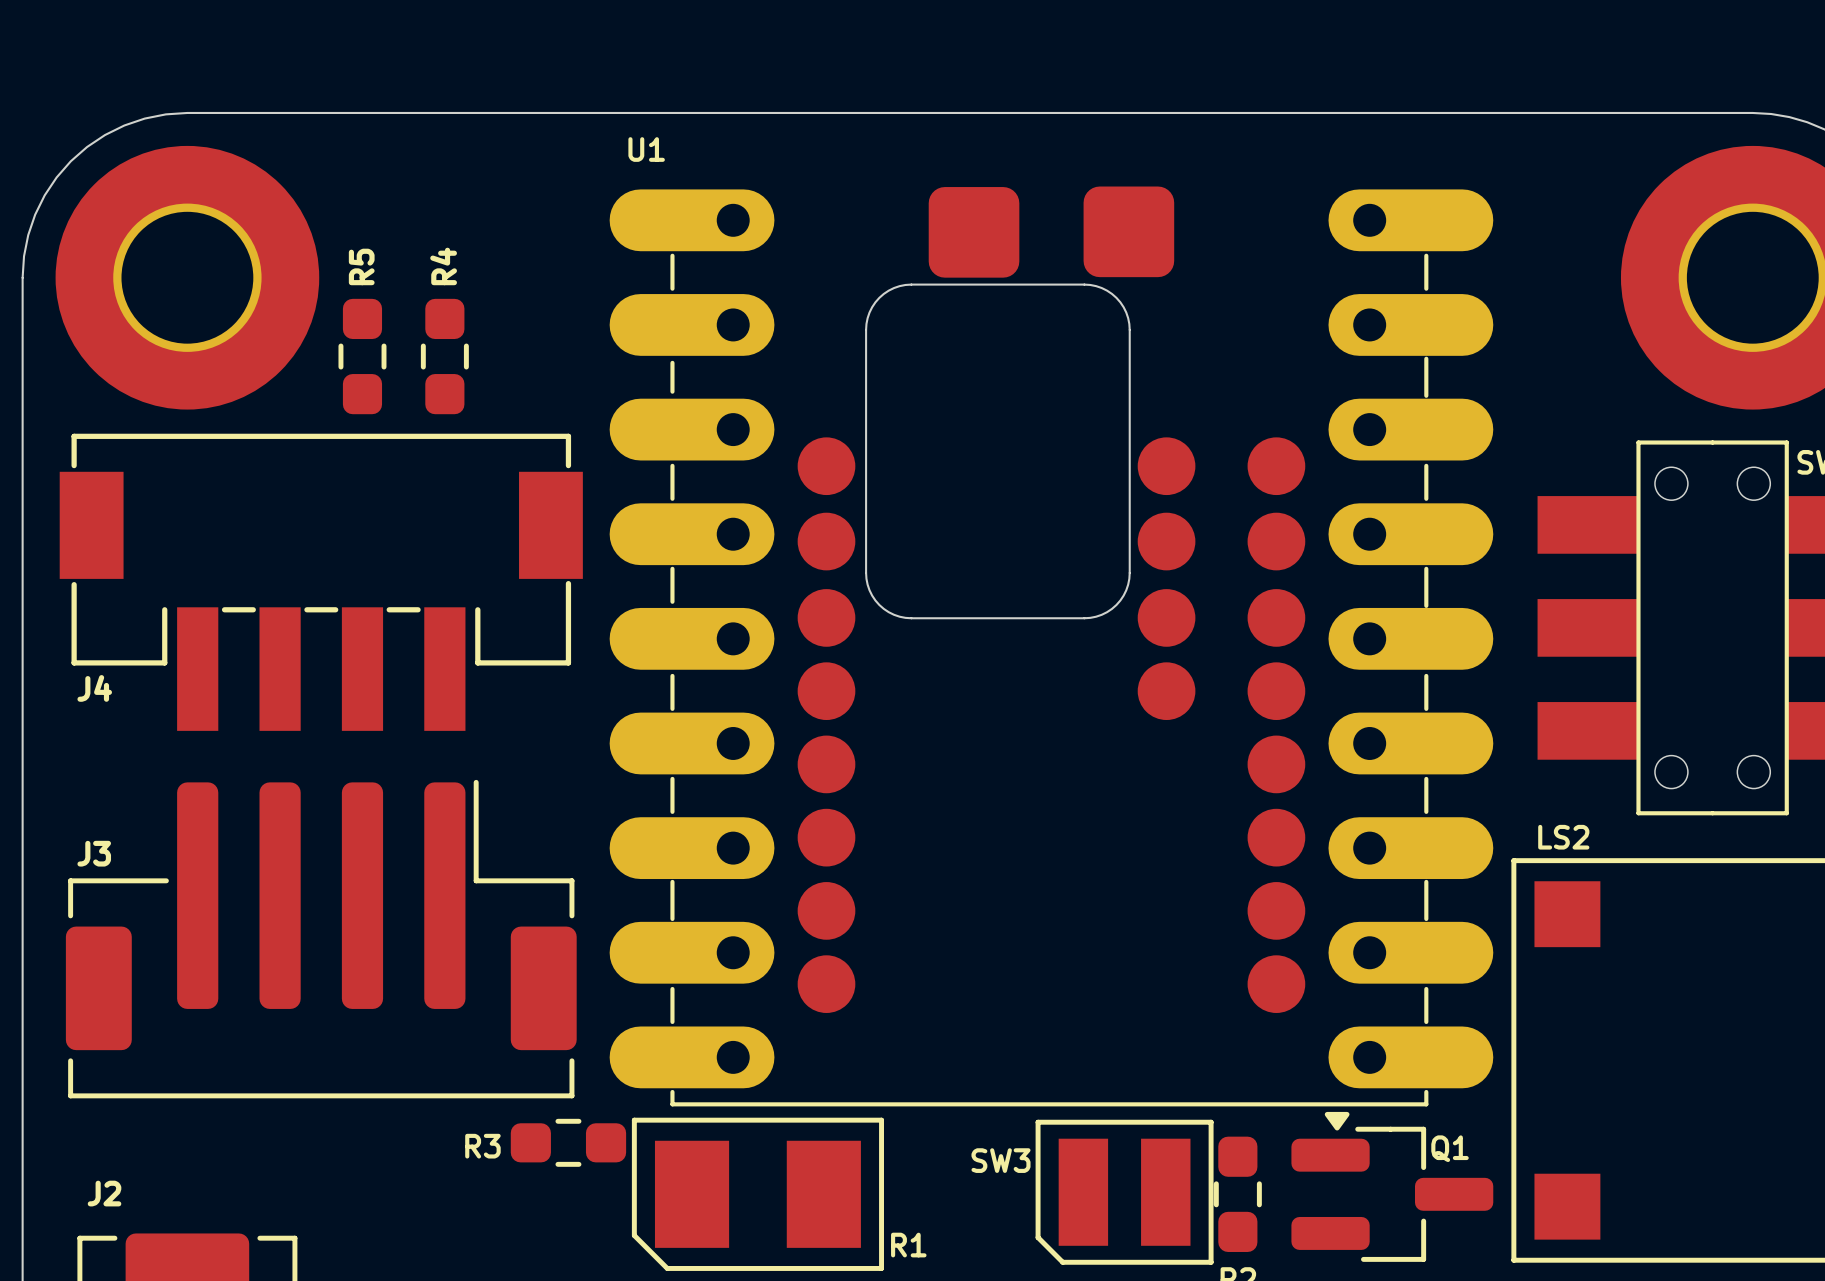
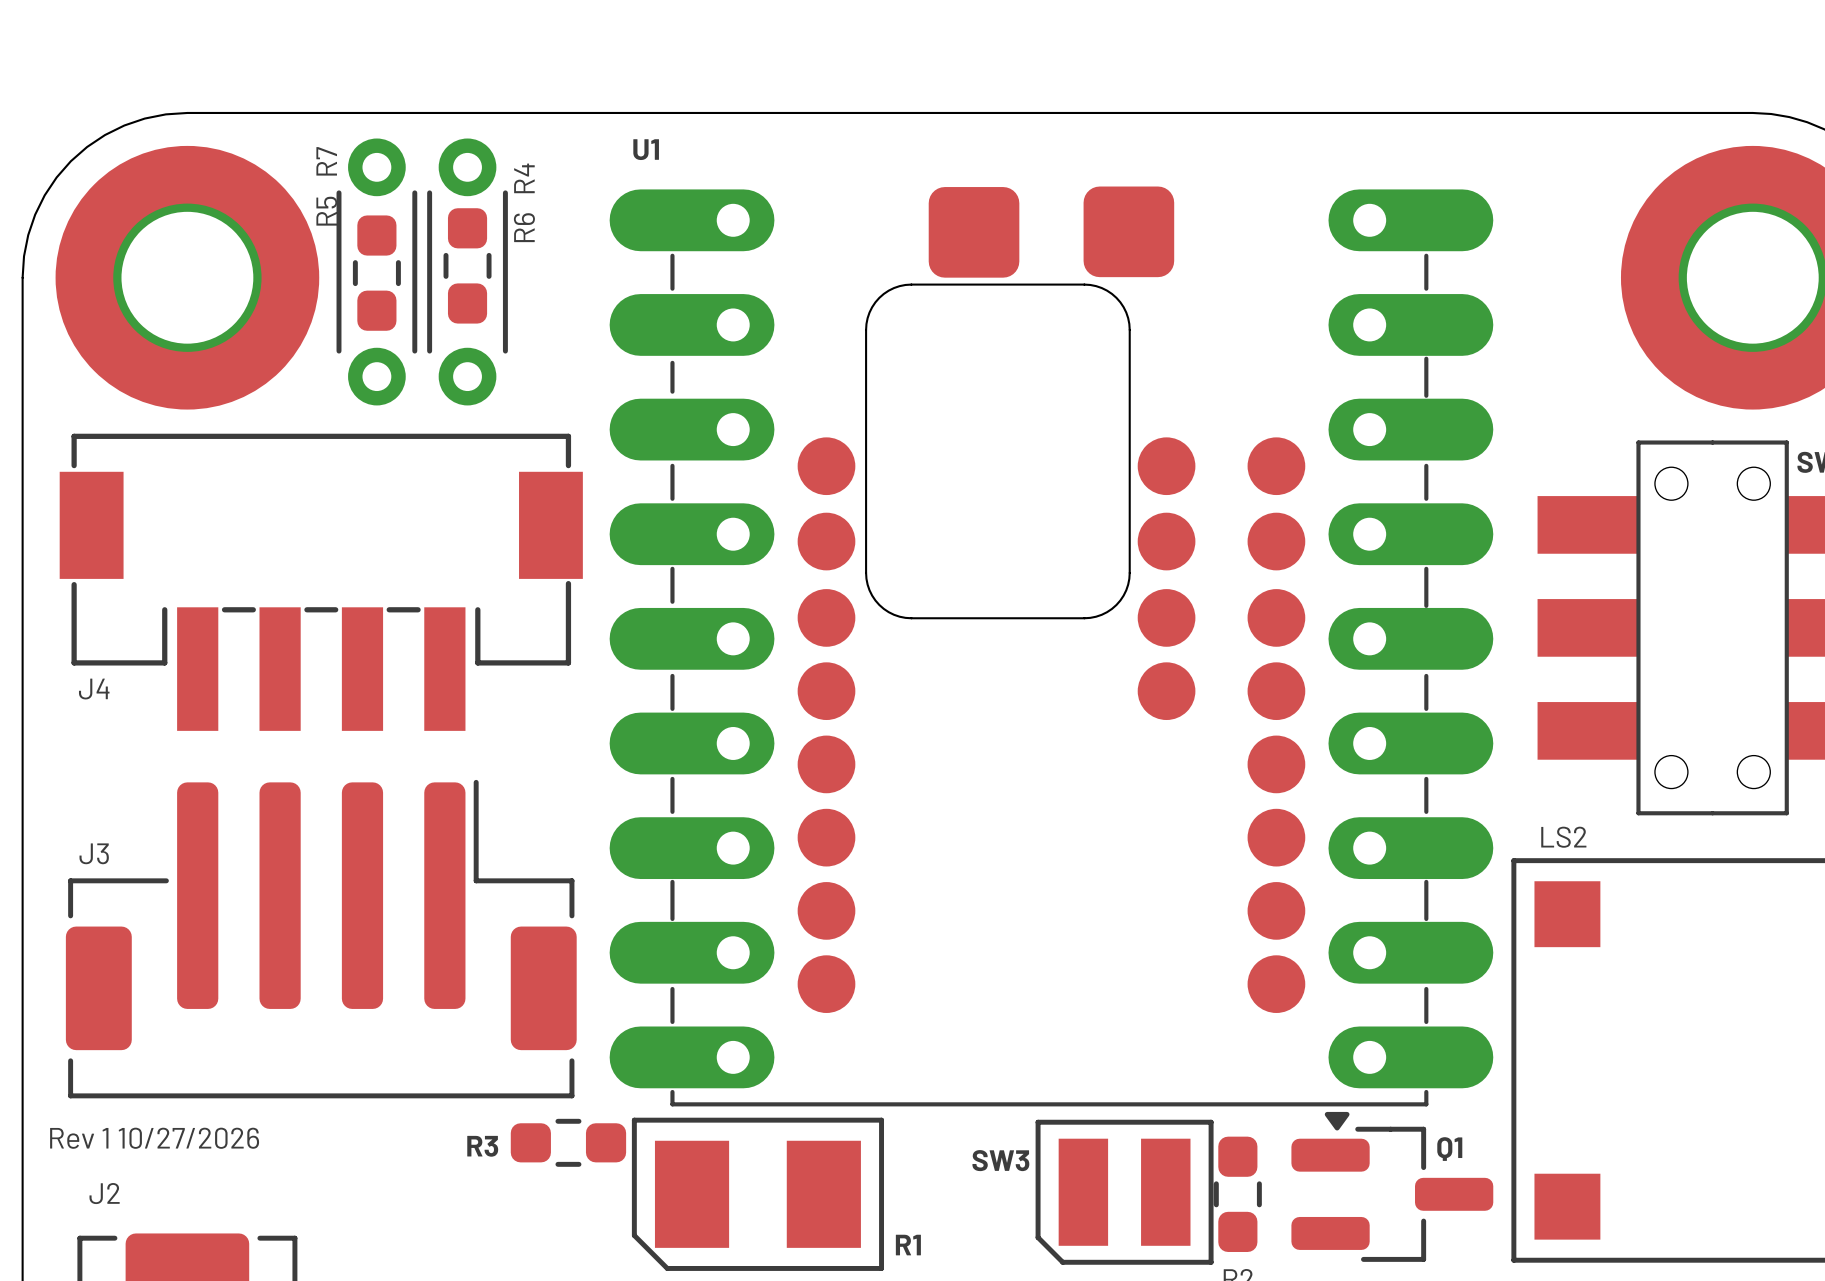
R5 name position: R5 (361, 266) -> R5 (326, 211)
R4 name position: R4 (443, 266) -> R4 (524, 178)
R7: none -> (376, 271)
R6: none -> (467, 271)
R5 position: (362, 356) -> (376, 273)
R4 position: (444, 356) -> (467, 265)
text: none -> Rev 1 10/27/2026 (154, 1138)

